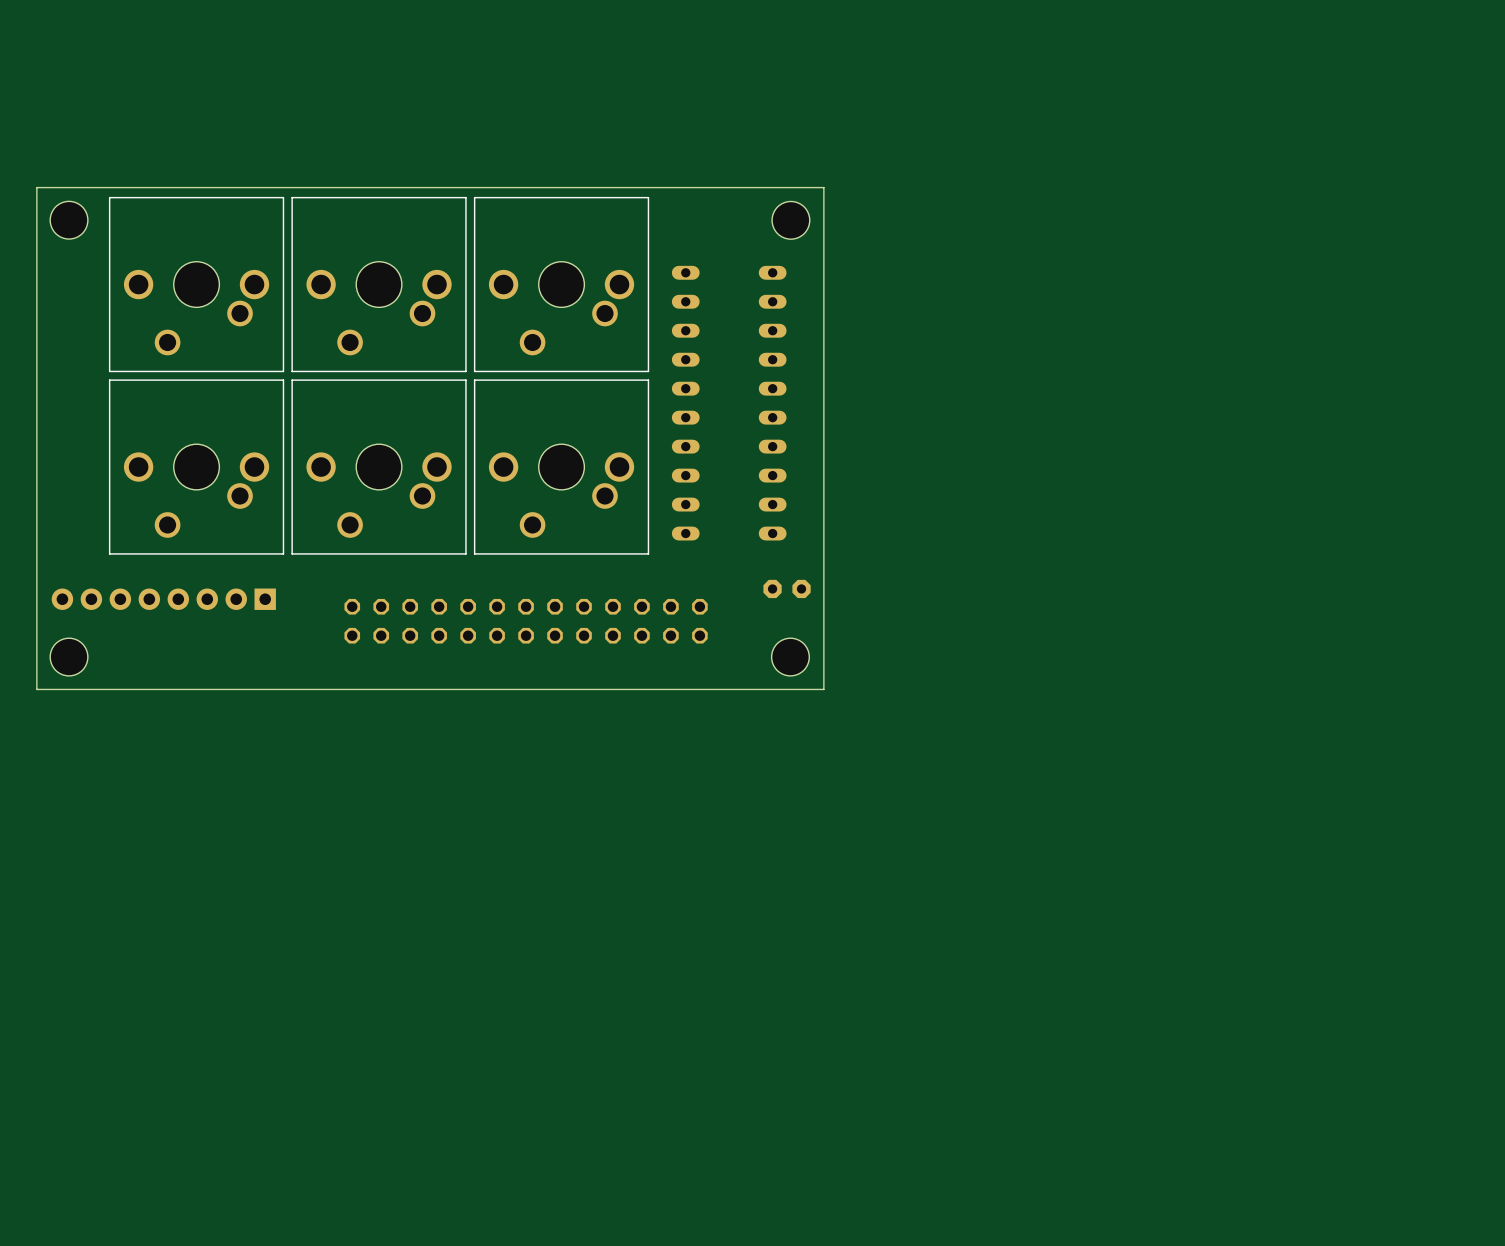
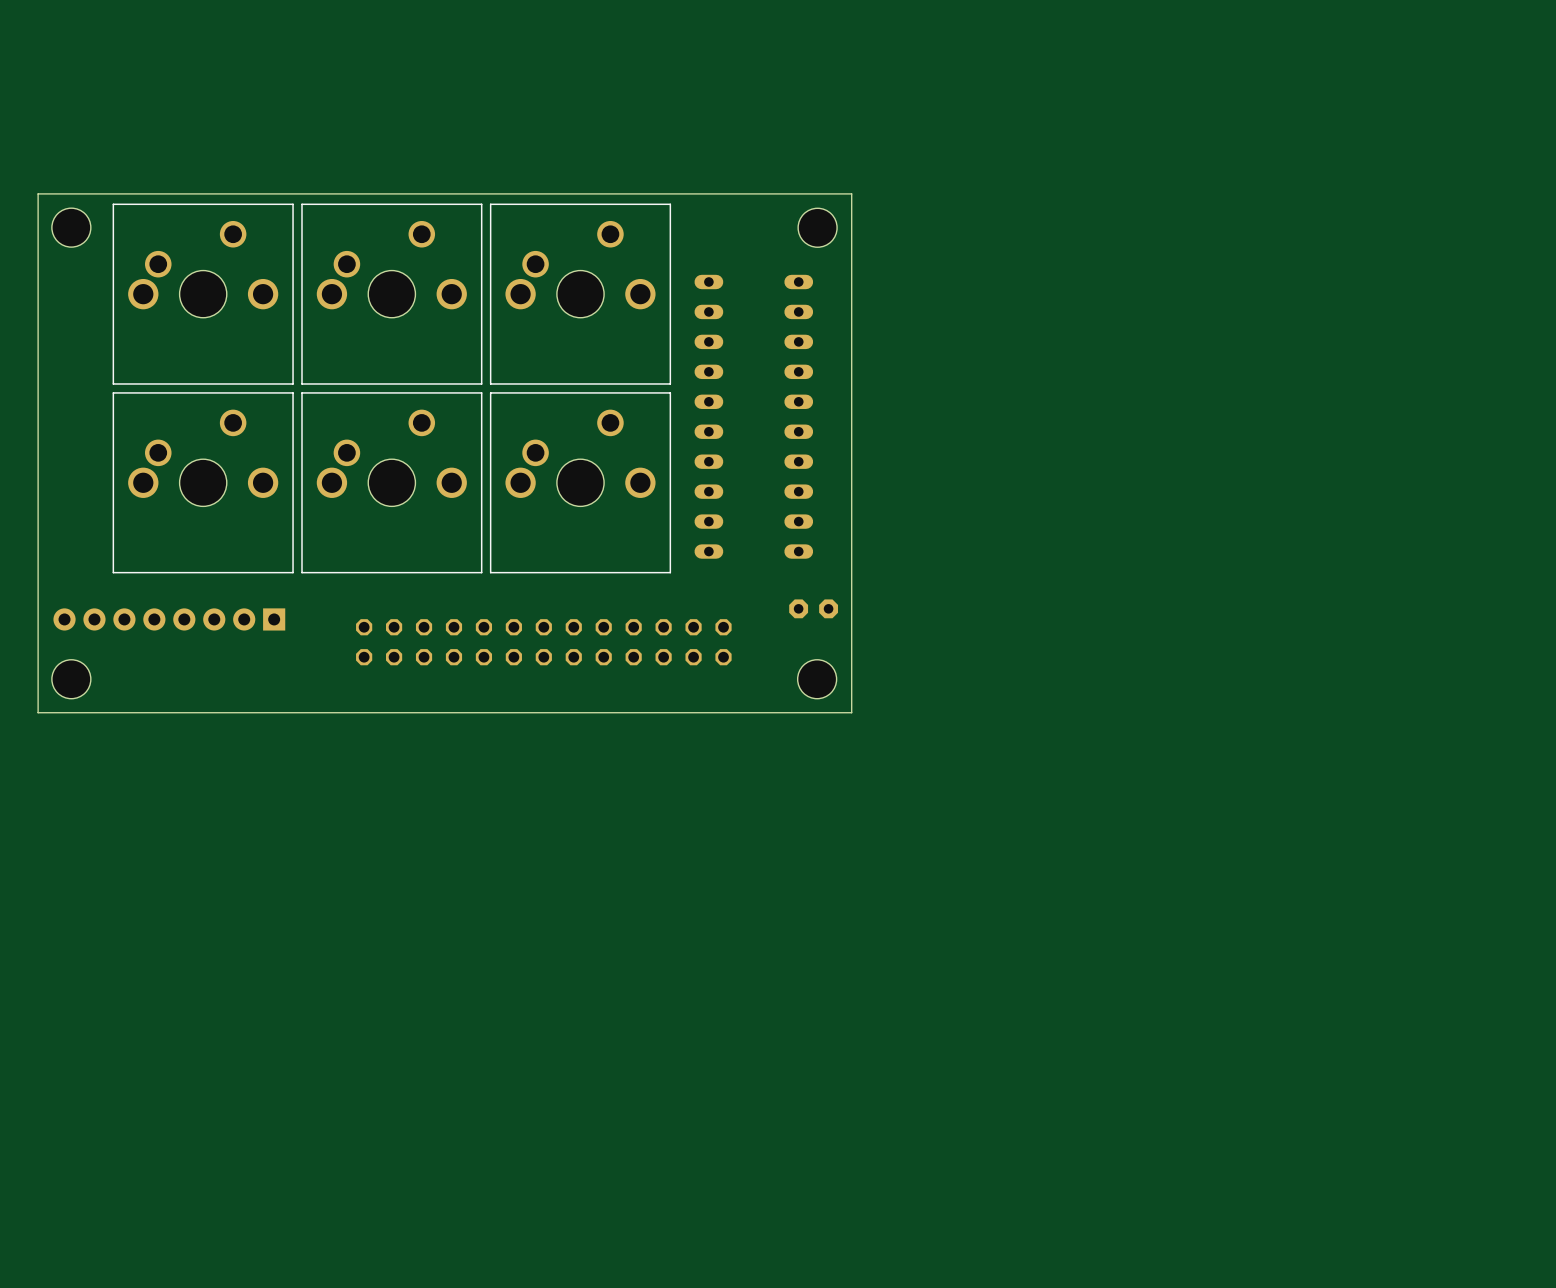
part rotation: 0° (196, 284) -> 180° (203, 294)
part rotation: 0° (379, 284) -> 180° (391, 294)
part rotation: 0° (561, 284) -> 180° (580, 294)
part rotation: 0° (196, 467) -> 180° (203, 482)
part rotation: 0° (379, 467) -> 180° (391, 482)
part rotation: 0° (561, 467) -> 180° (580, 482)

